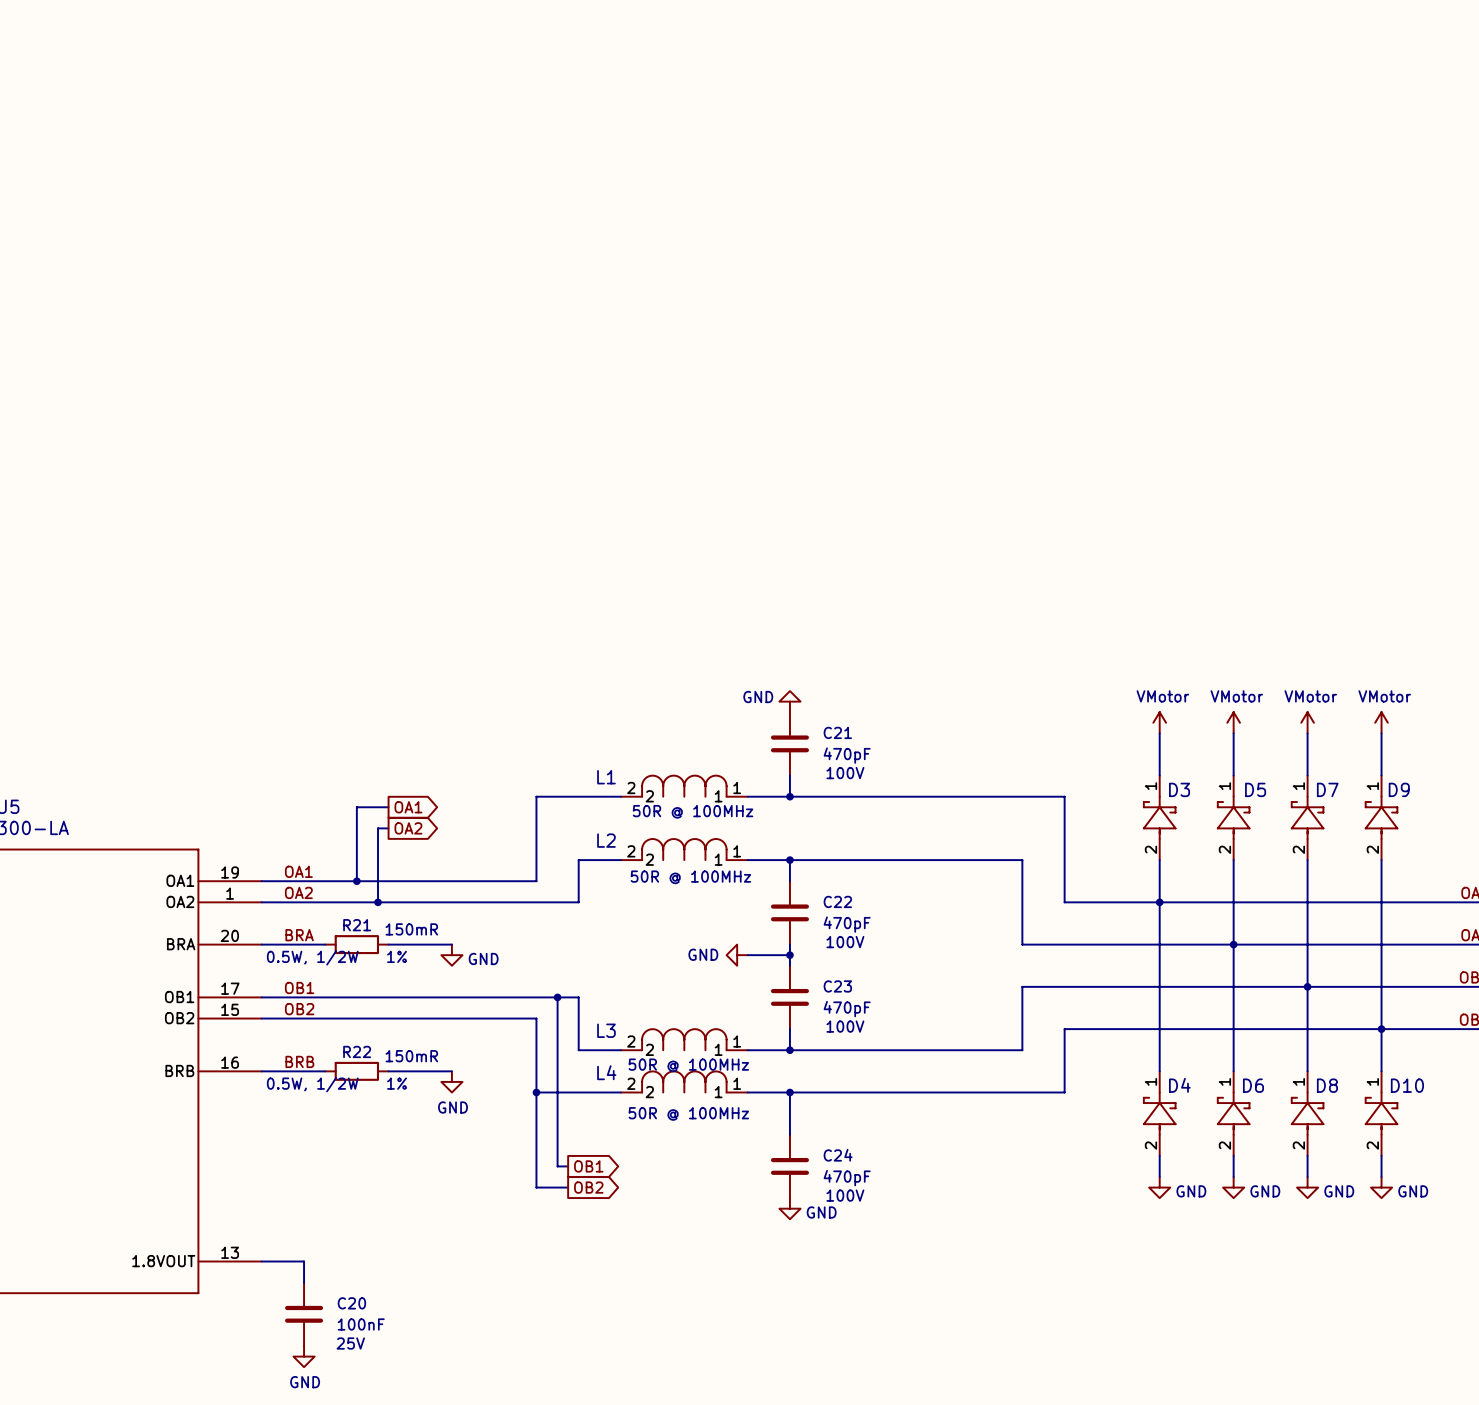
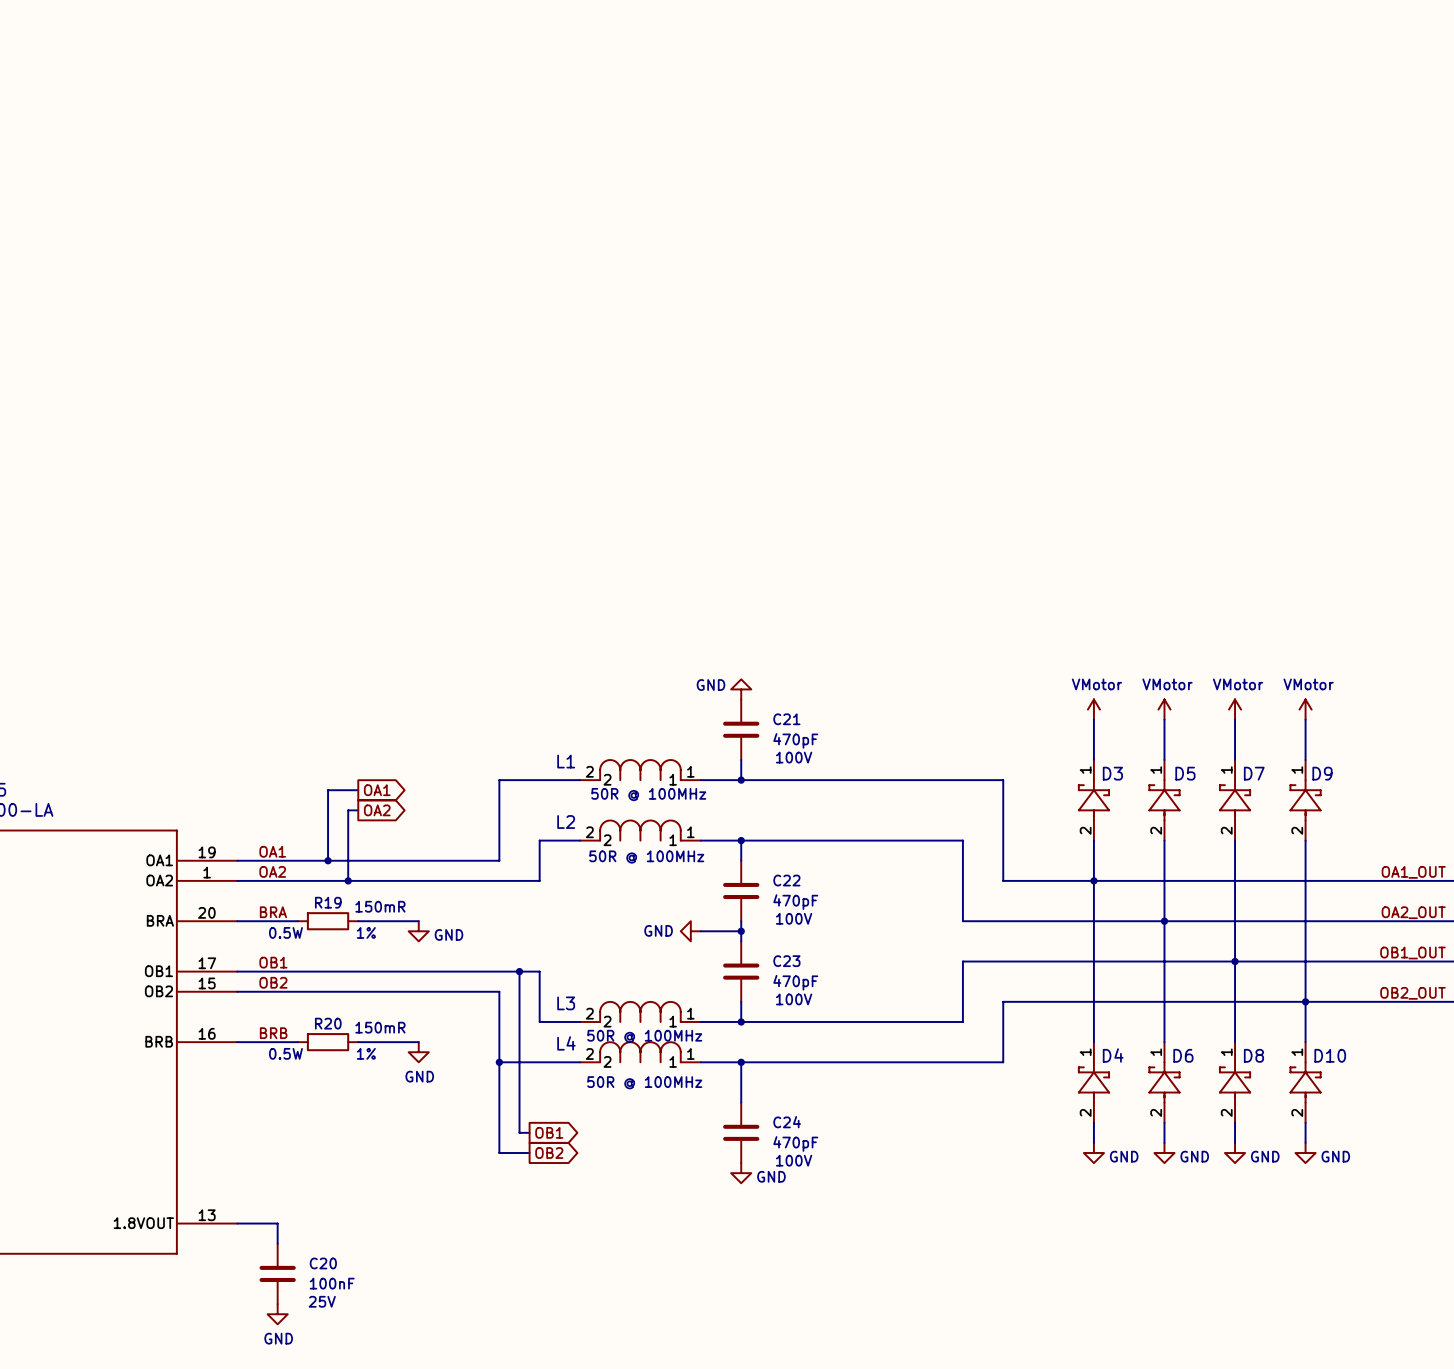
R21 name: R21 (357, 925) -> R19 (328, 902)
R21 text: 0.5W, 1/2W (312, 957) -> 0.5W (285, 932)
R22 name: R22 (357, 1051) -> R20 (328, 1023)
R22 text: 0.5W, 1/2W (312, 1084) -> 0.5W (285, 1053)

